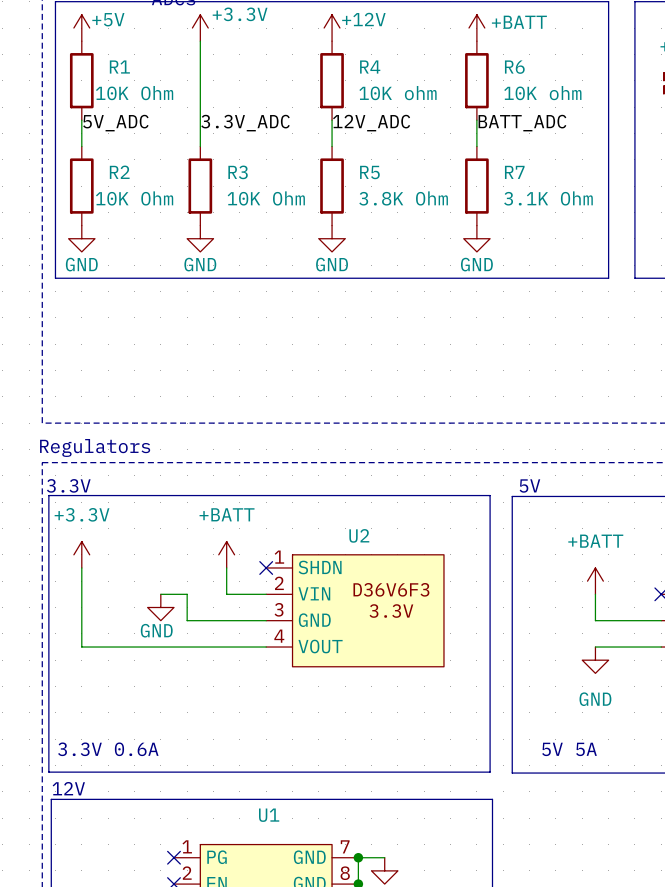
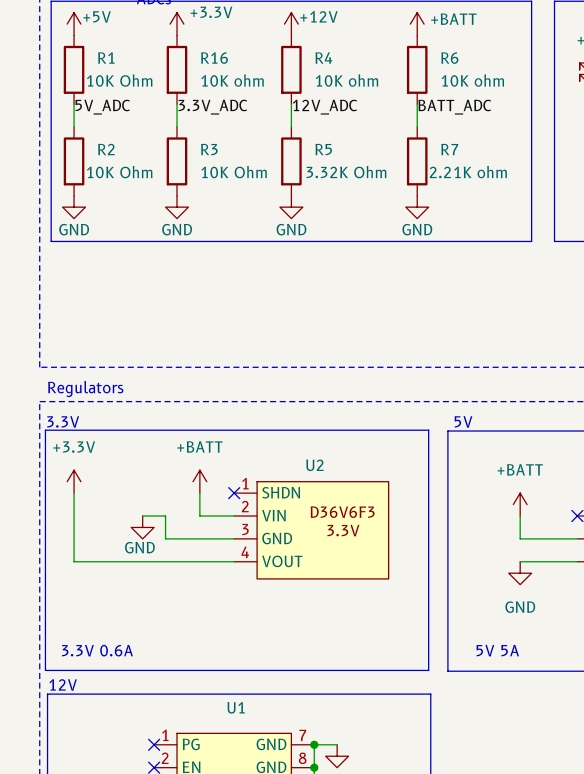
wire: (200, 41) (200, 120) -> none
R16: none -> 10K ohm (177, 69)
R5 value: 3.8K Ohm (403, 198) -> 3.32K Ohm (346, 172)
R7 value: 3.1K Ohm (548, 198) -> 2.21K ohm (468, 172)

